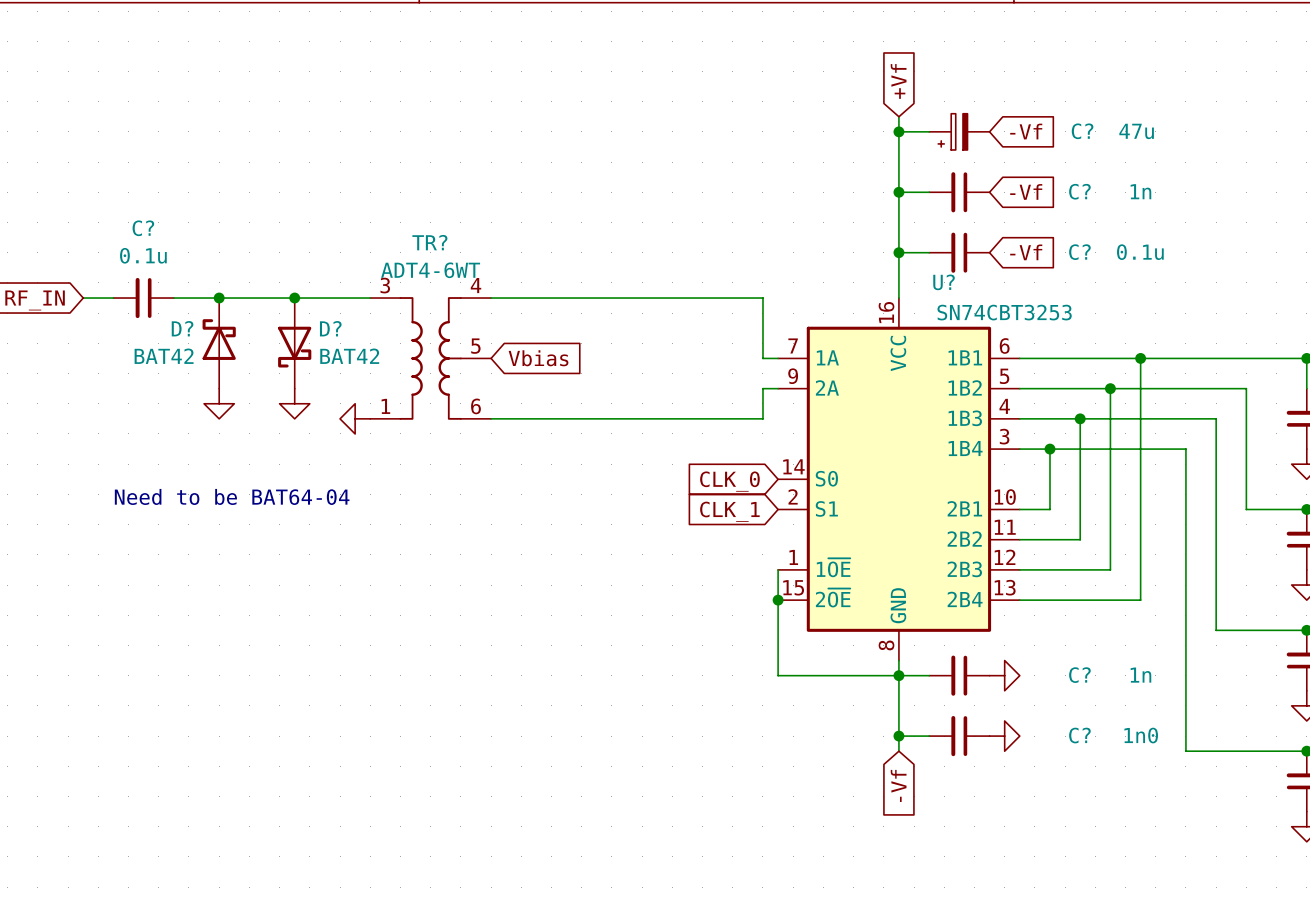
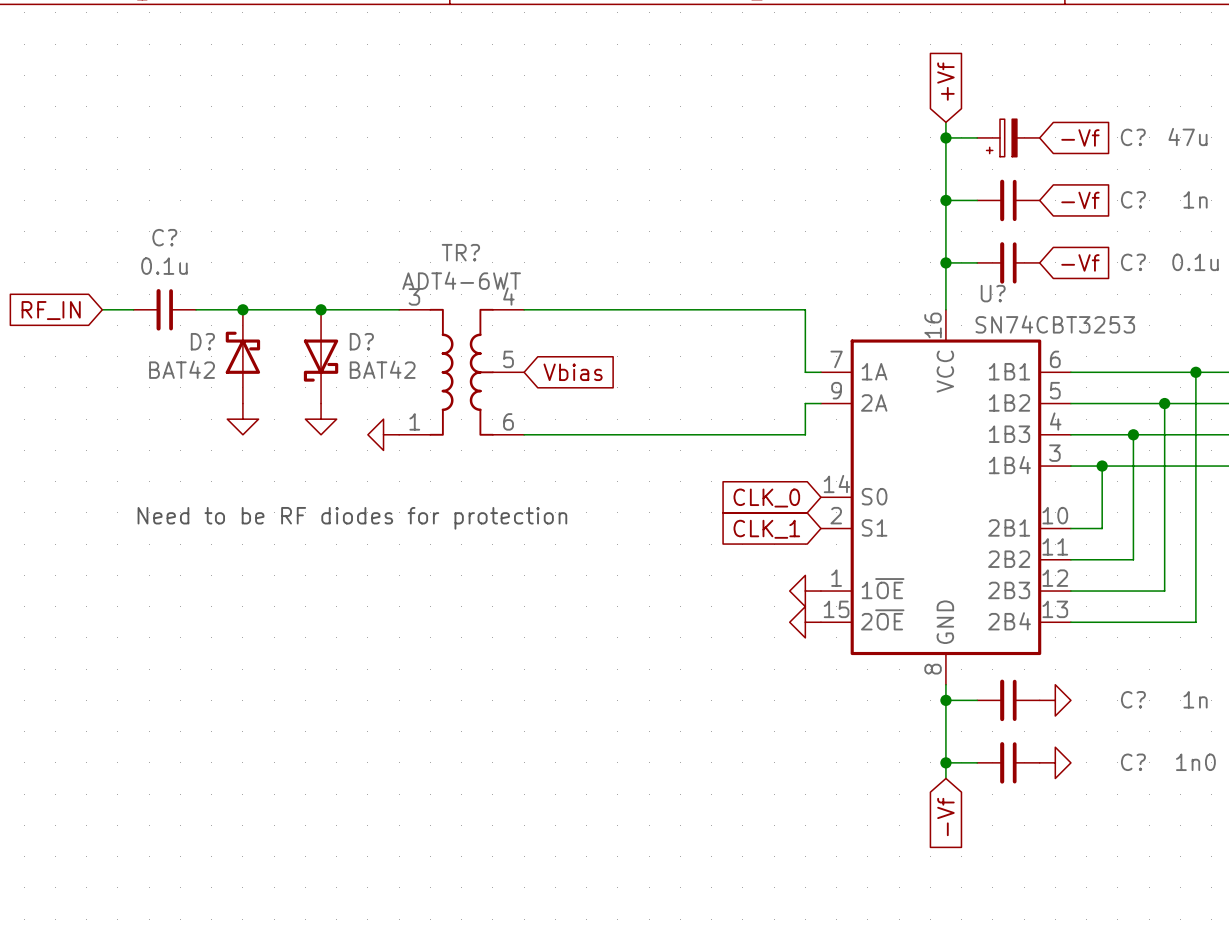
text: Need to be BAT64-04 (232, 496) -> Need to be RF diodes for protection (352, 518)
power symbol: none -> (805, 591)
wire: (778, 569) (778, 675) (898, 675) -> none
power symbol: none -> (805, 622)
junction: (778, 600) -> none

